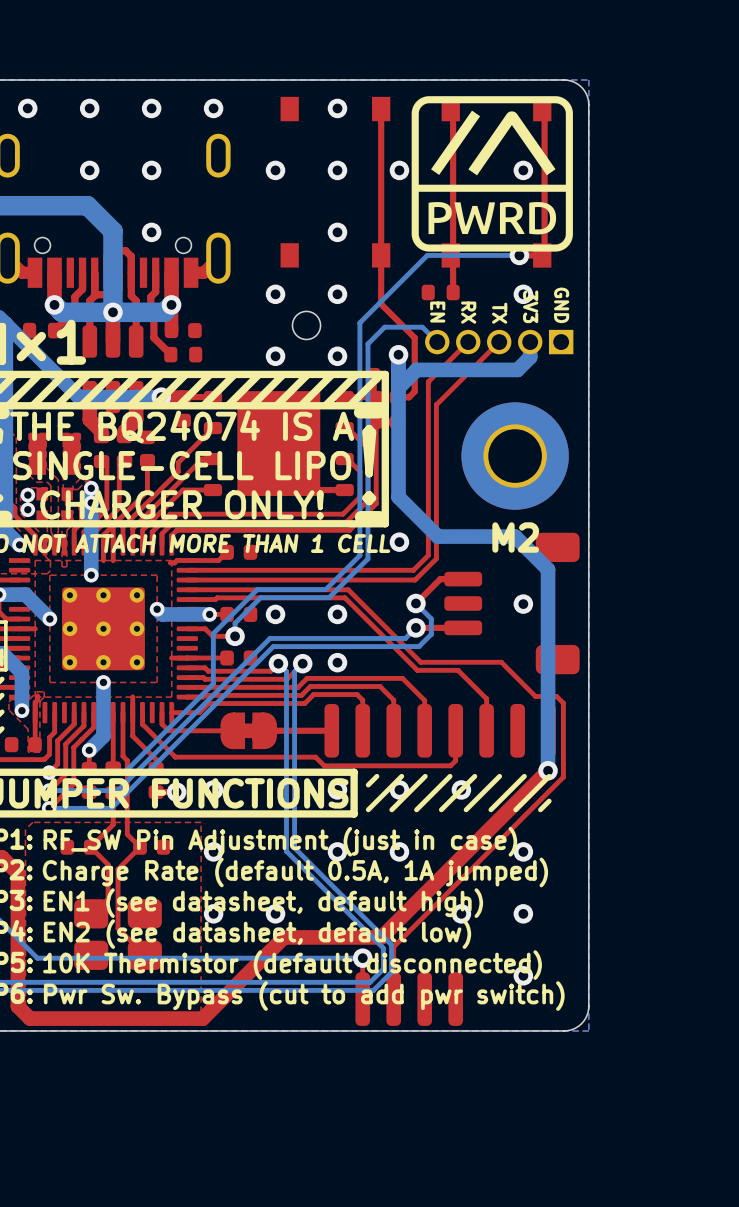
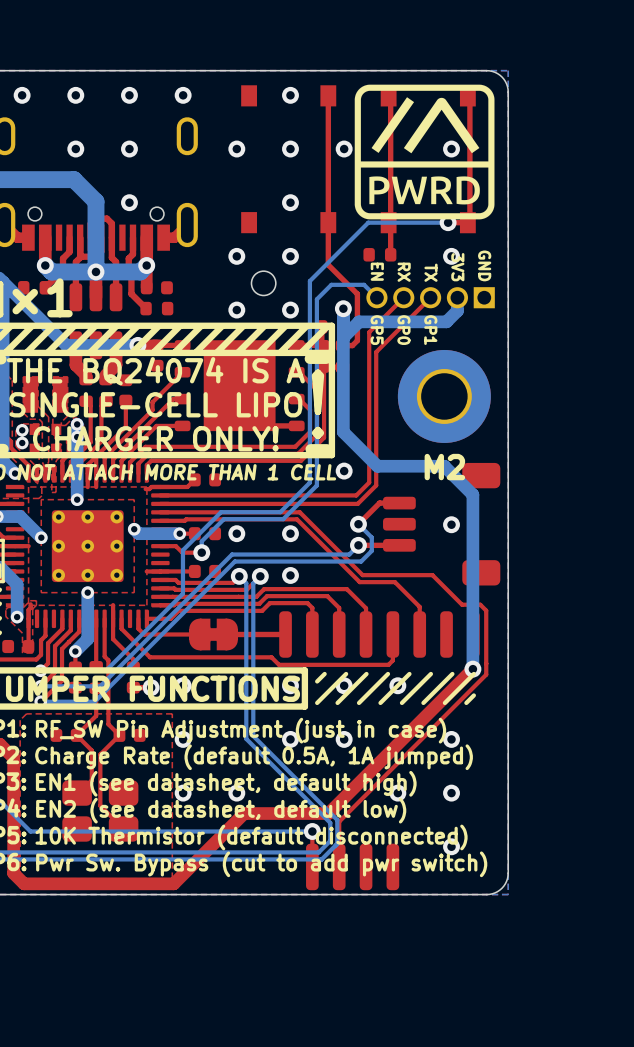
text: none -> GP5 (377, 330)
text: none -> GP0 (403, 330)
text: none -> GP1 (430, 330)

